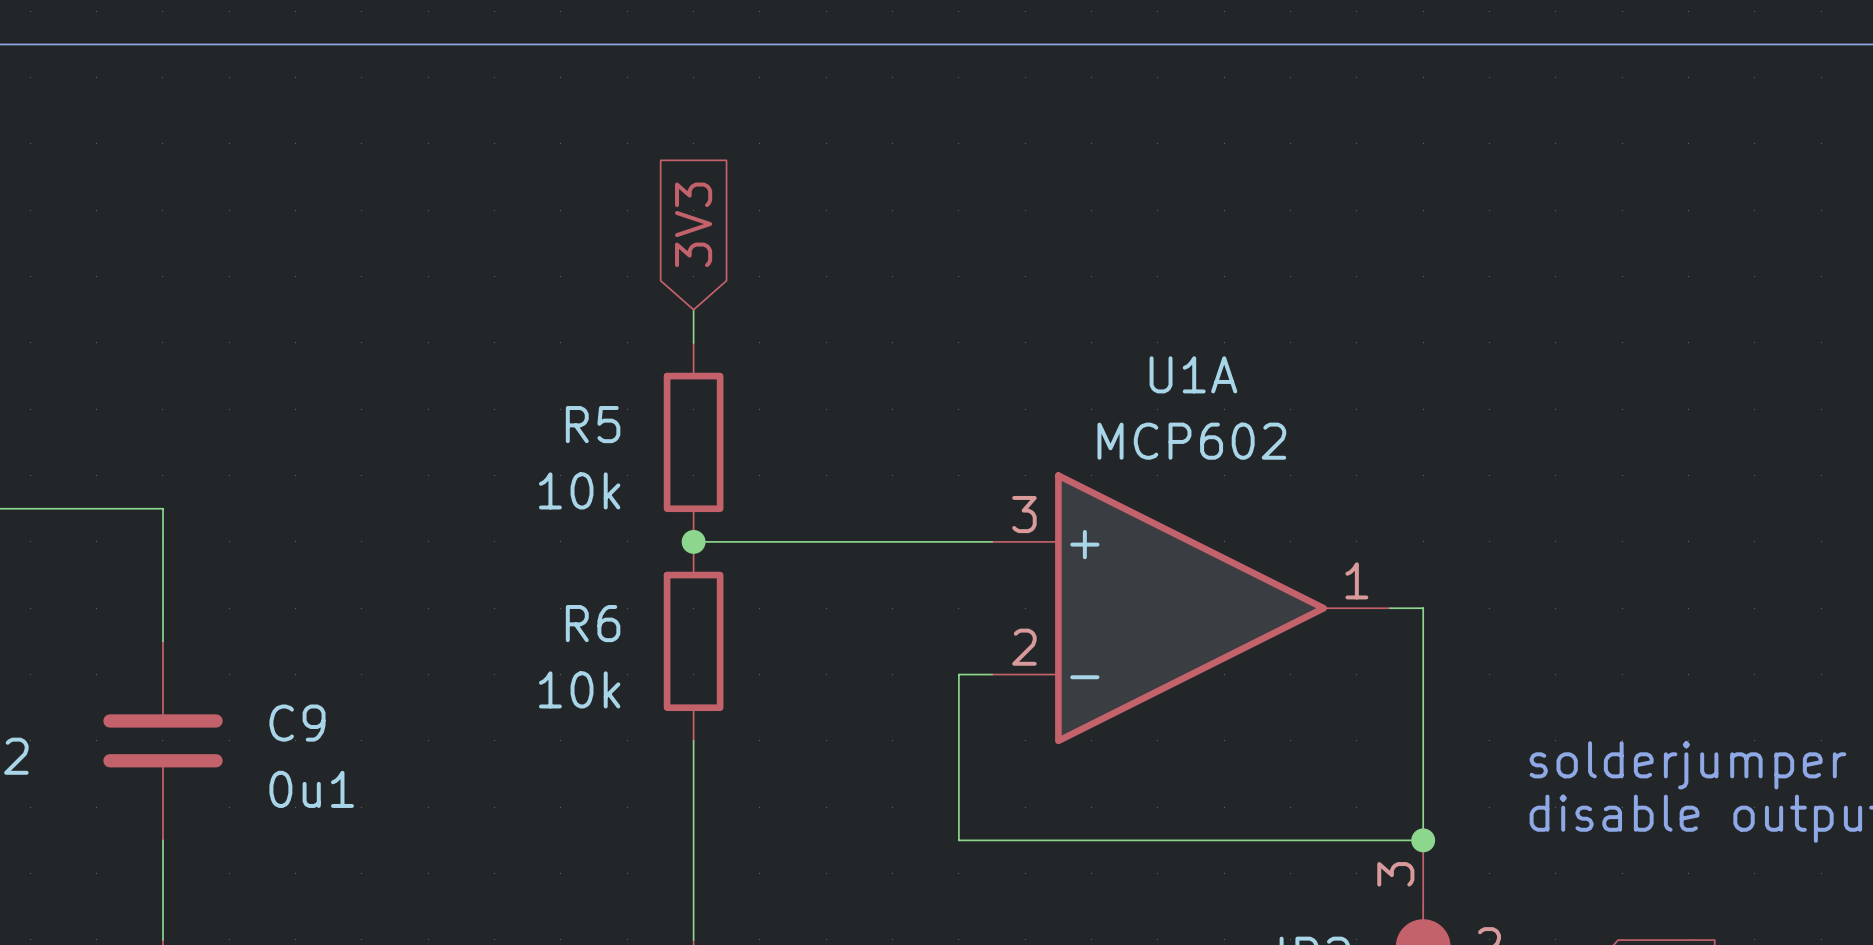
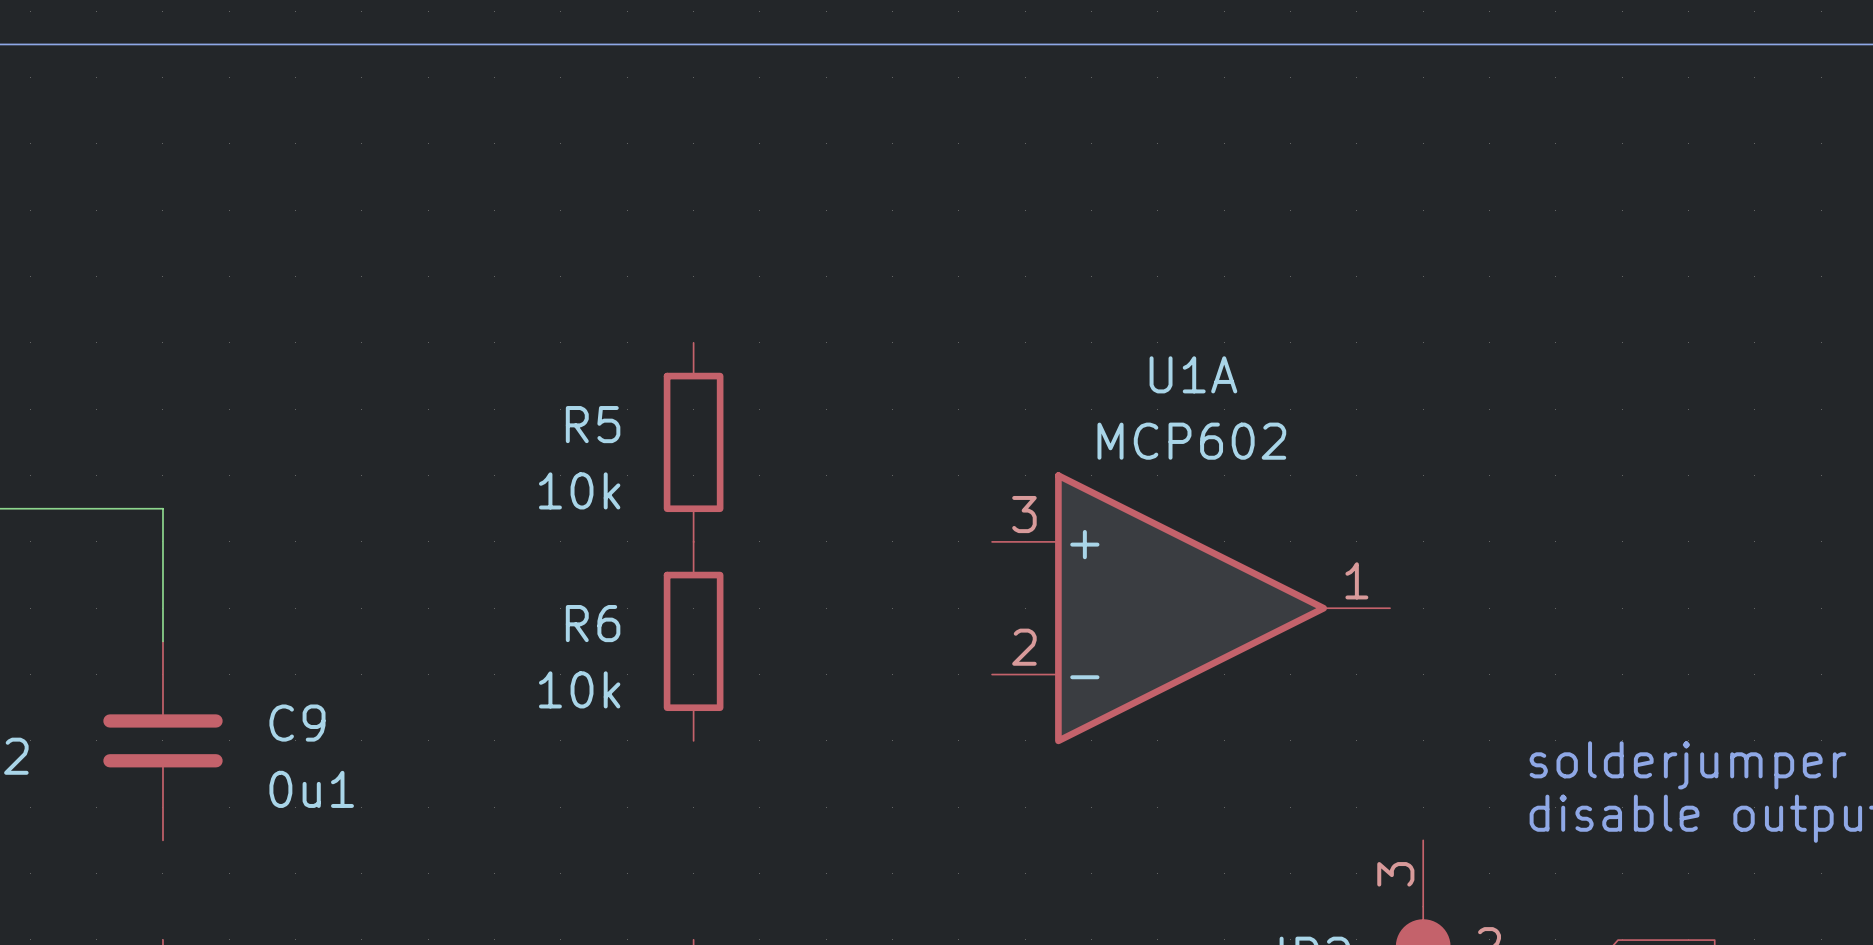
global label: 3V3 (693, 224) -> none
wire: (693, 309) (693, 342) -> none
wire: (693, 541) (992, 541) -> none
junction: (693, 541) -> none
wire: (1390, 608) (1423, 608) (1423, 840) (958, 840) (958, 674) (992, 674) -> none
wire: (693, 740) (693, 939) -> none
wire: (162, 840) (162, 939) -> none
junction: (1423, 840) -> none

